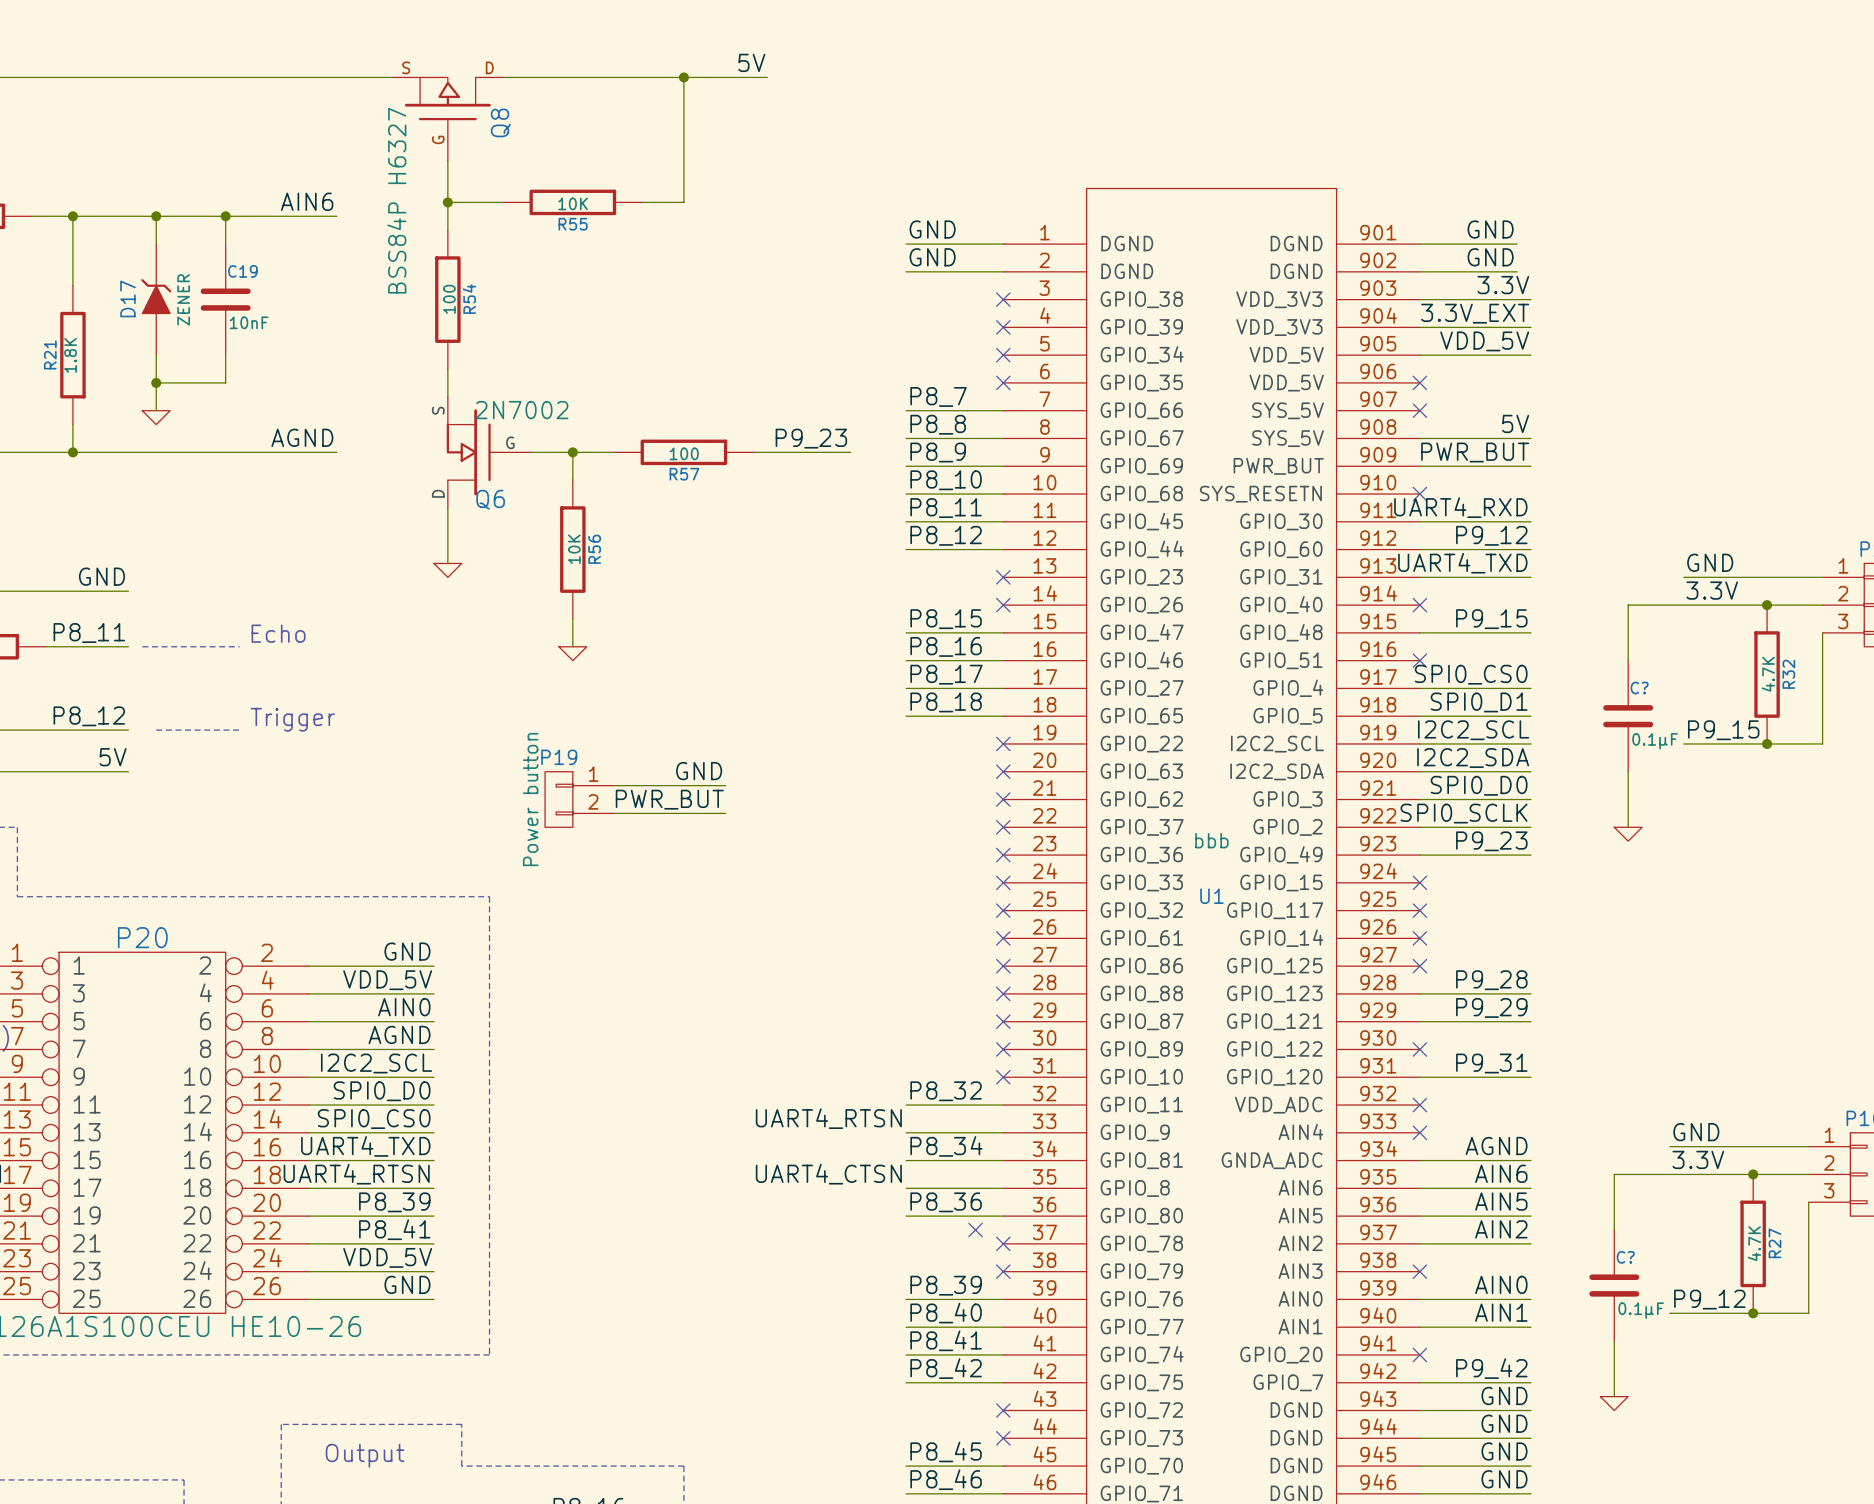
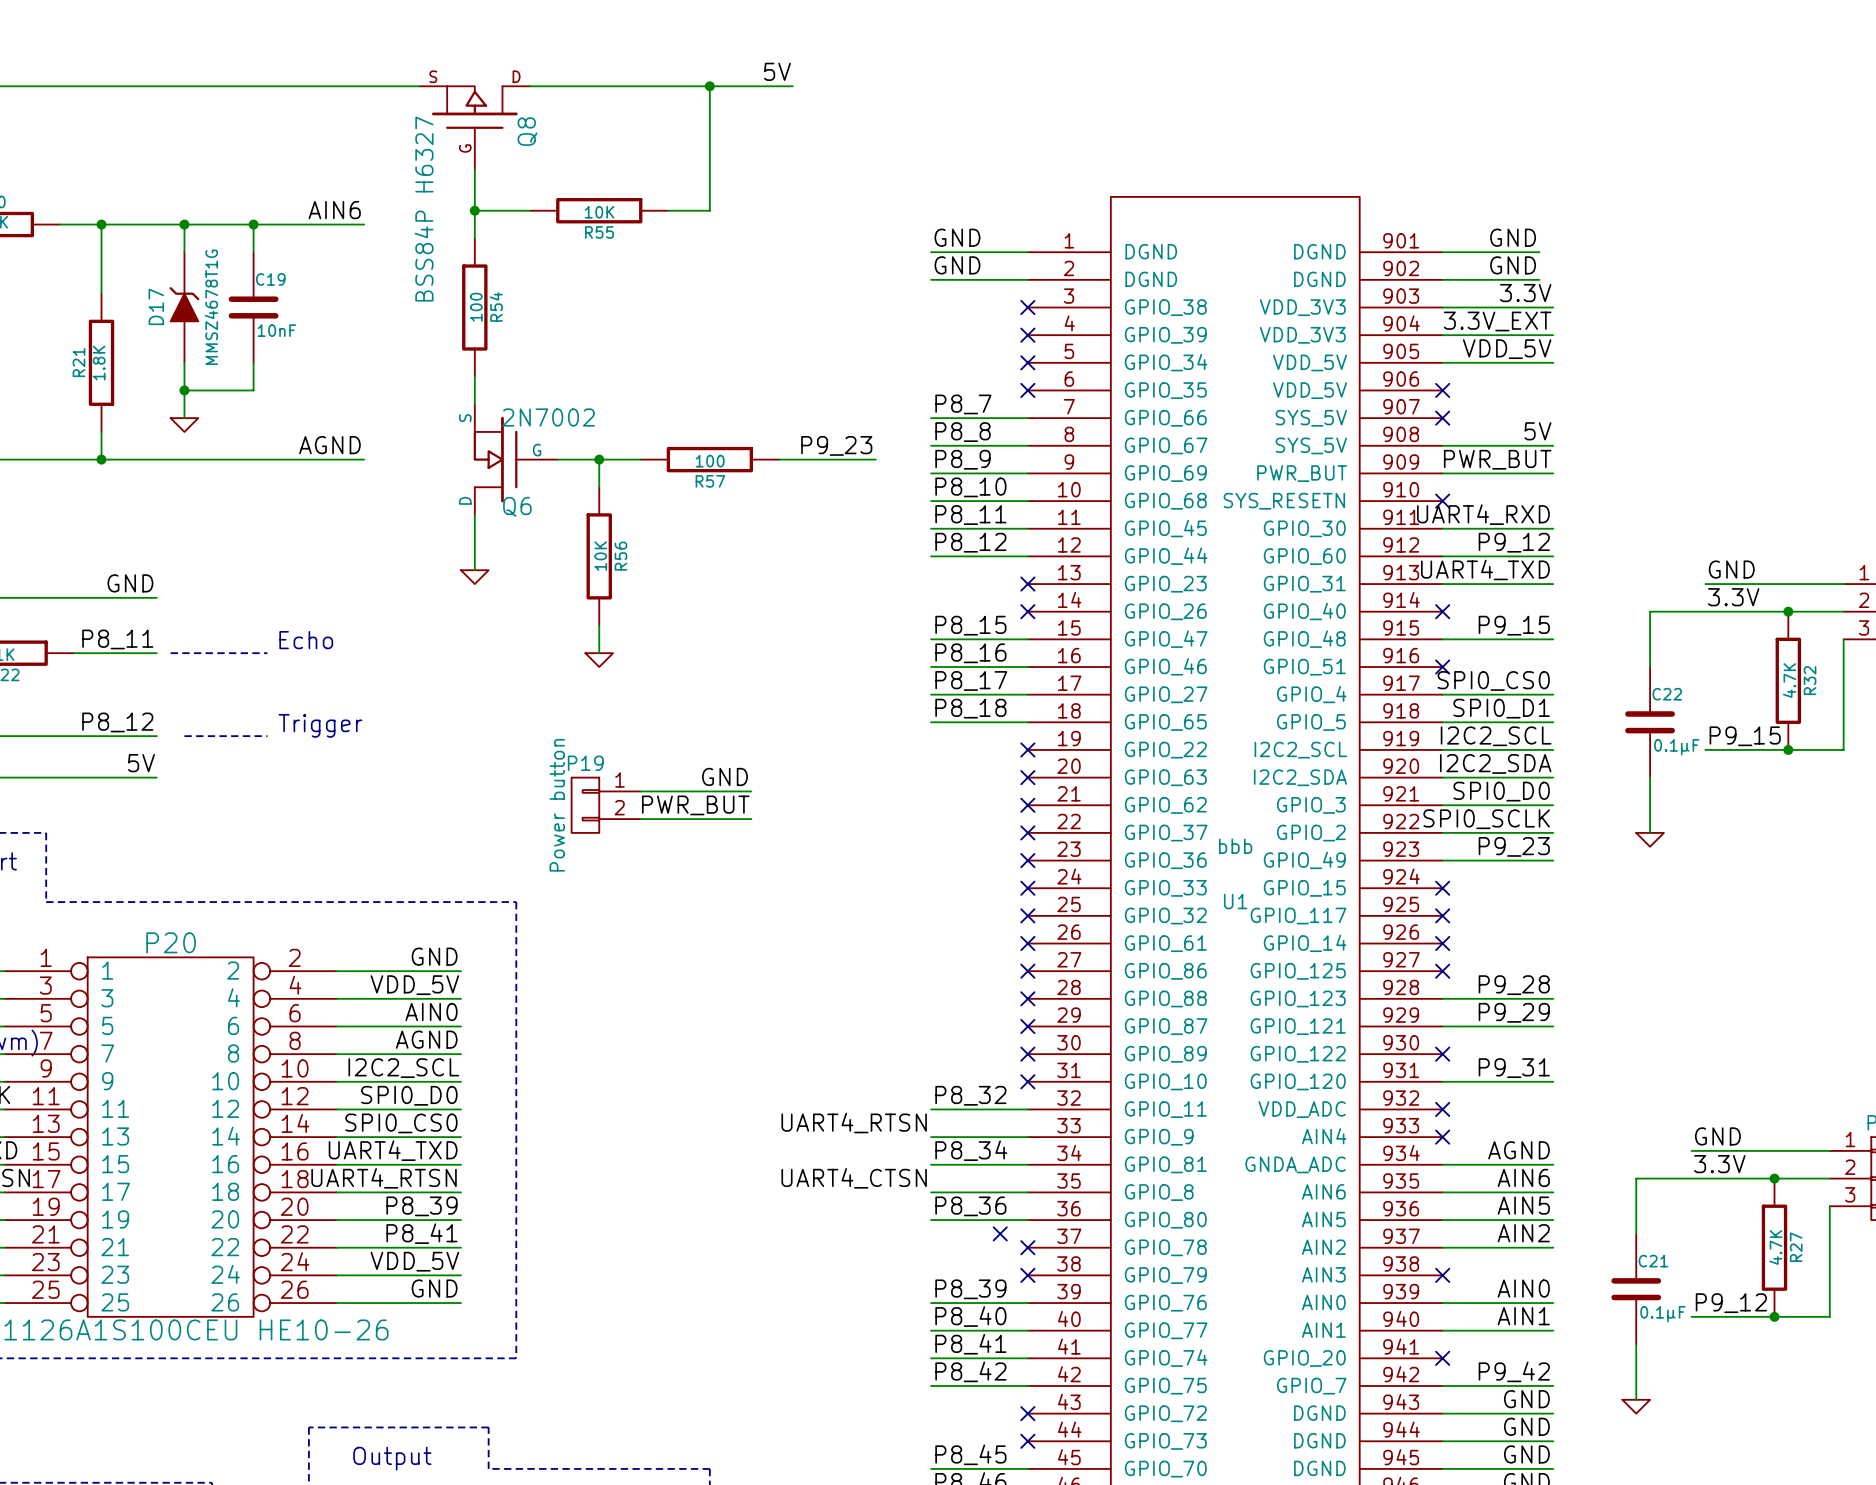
D17 value: ZENER (183, 299) -> MMSZ4678T1G (211, 307)
C? name: C? (1639, 688) -> C22 (1667, 694)
C? name: C? (1625, 1257) -> C21 (1653, 1261)

